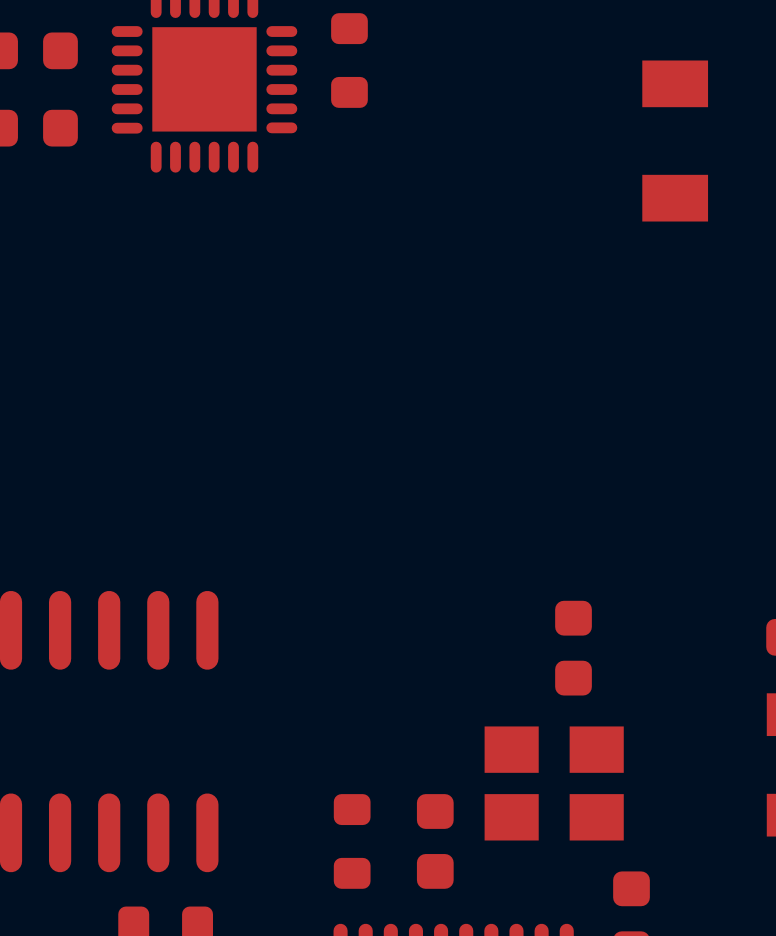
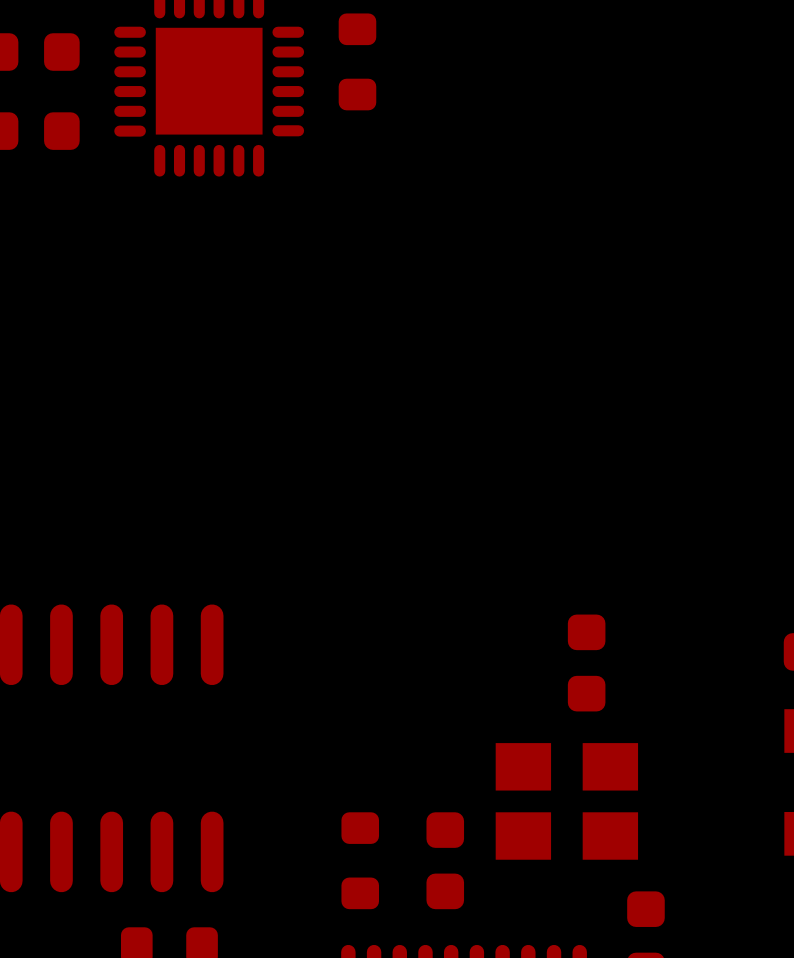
part: (675, 141) -> none

